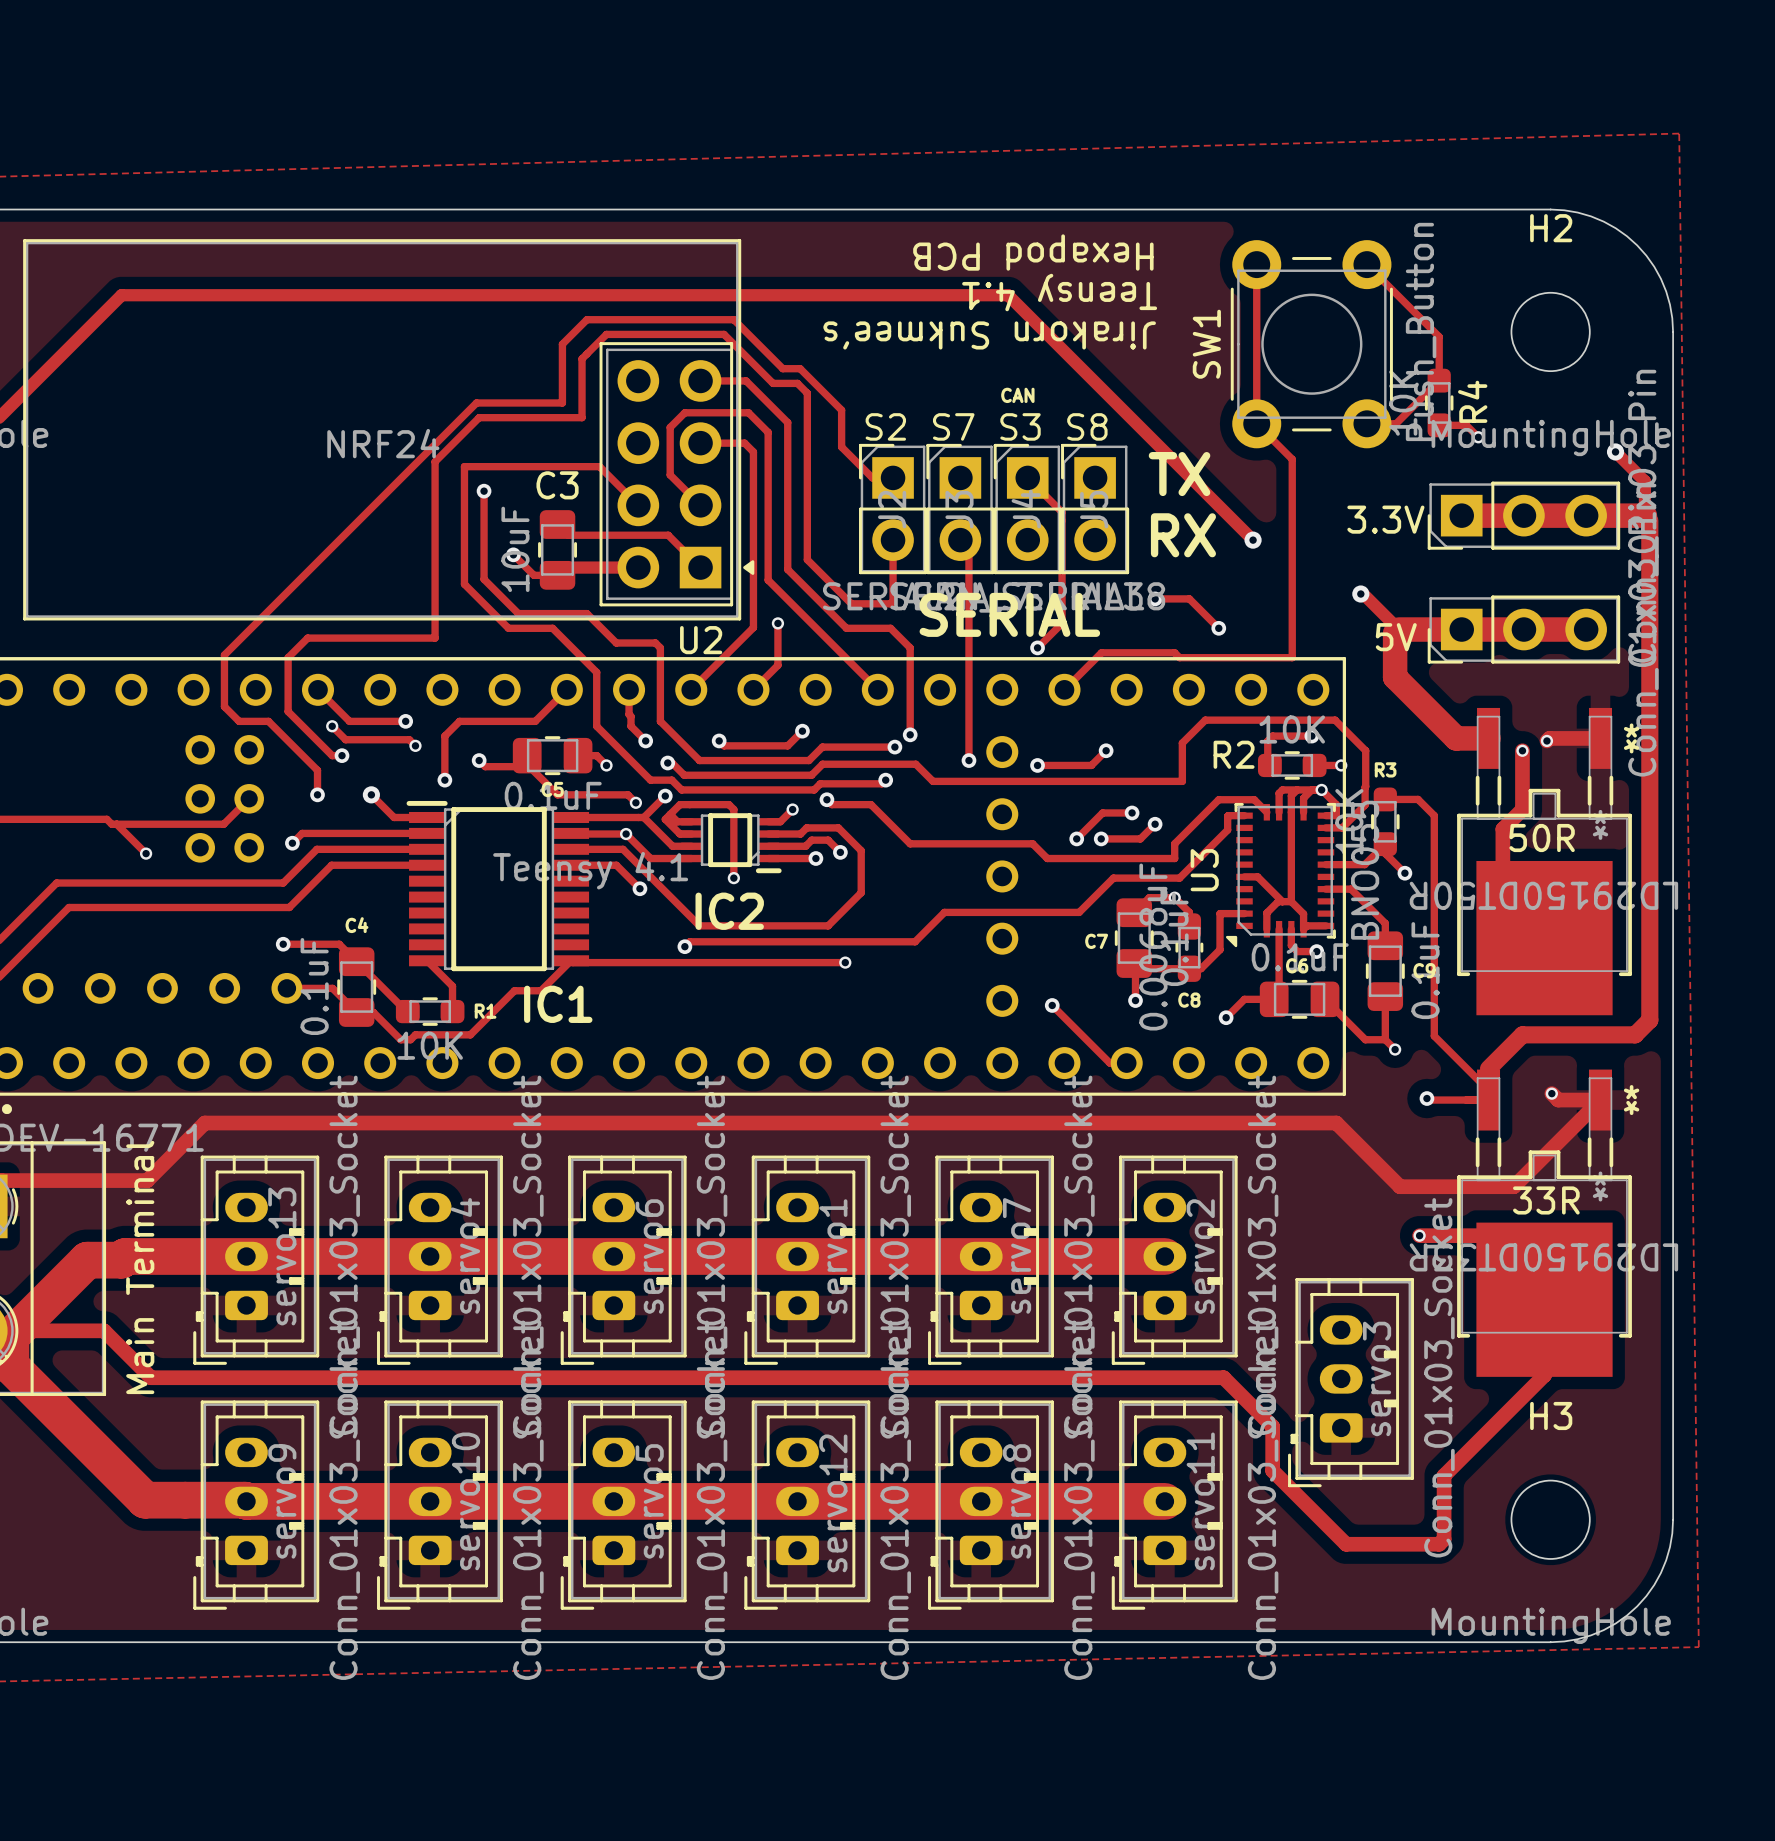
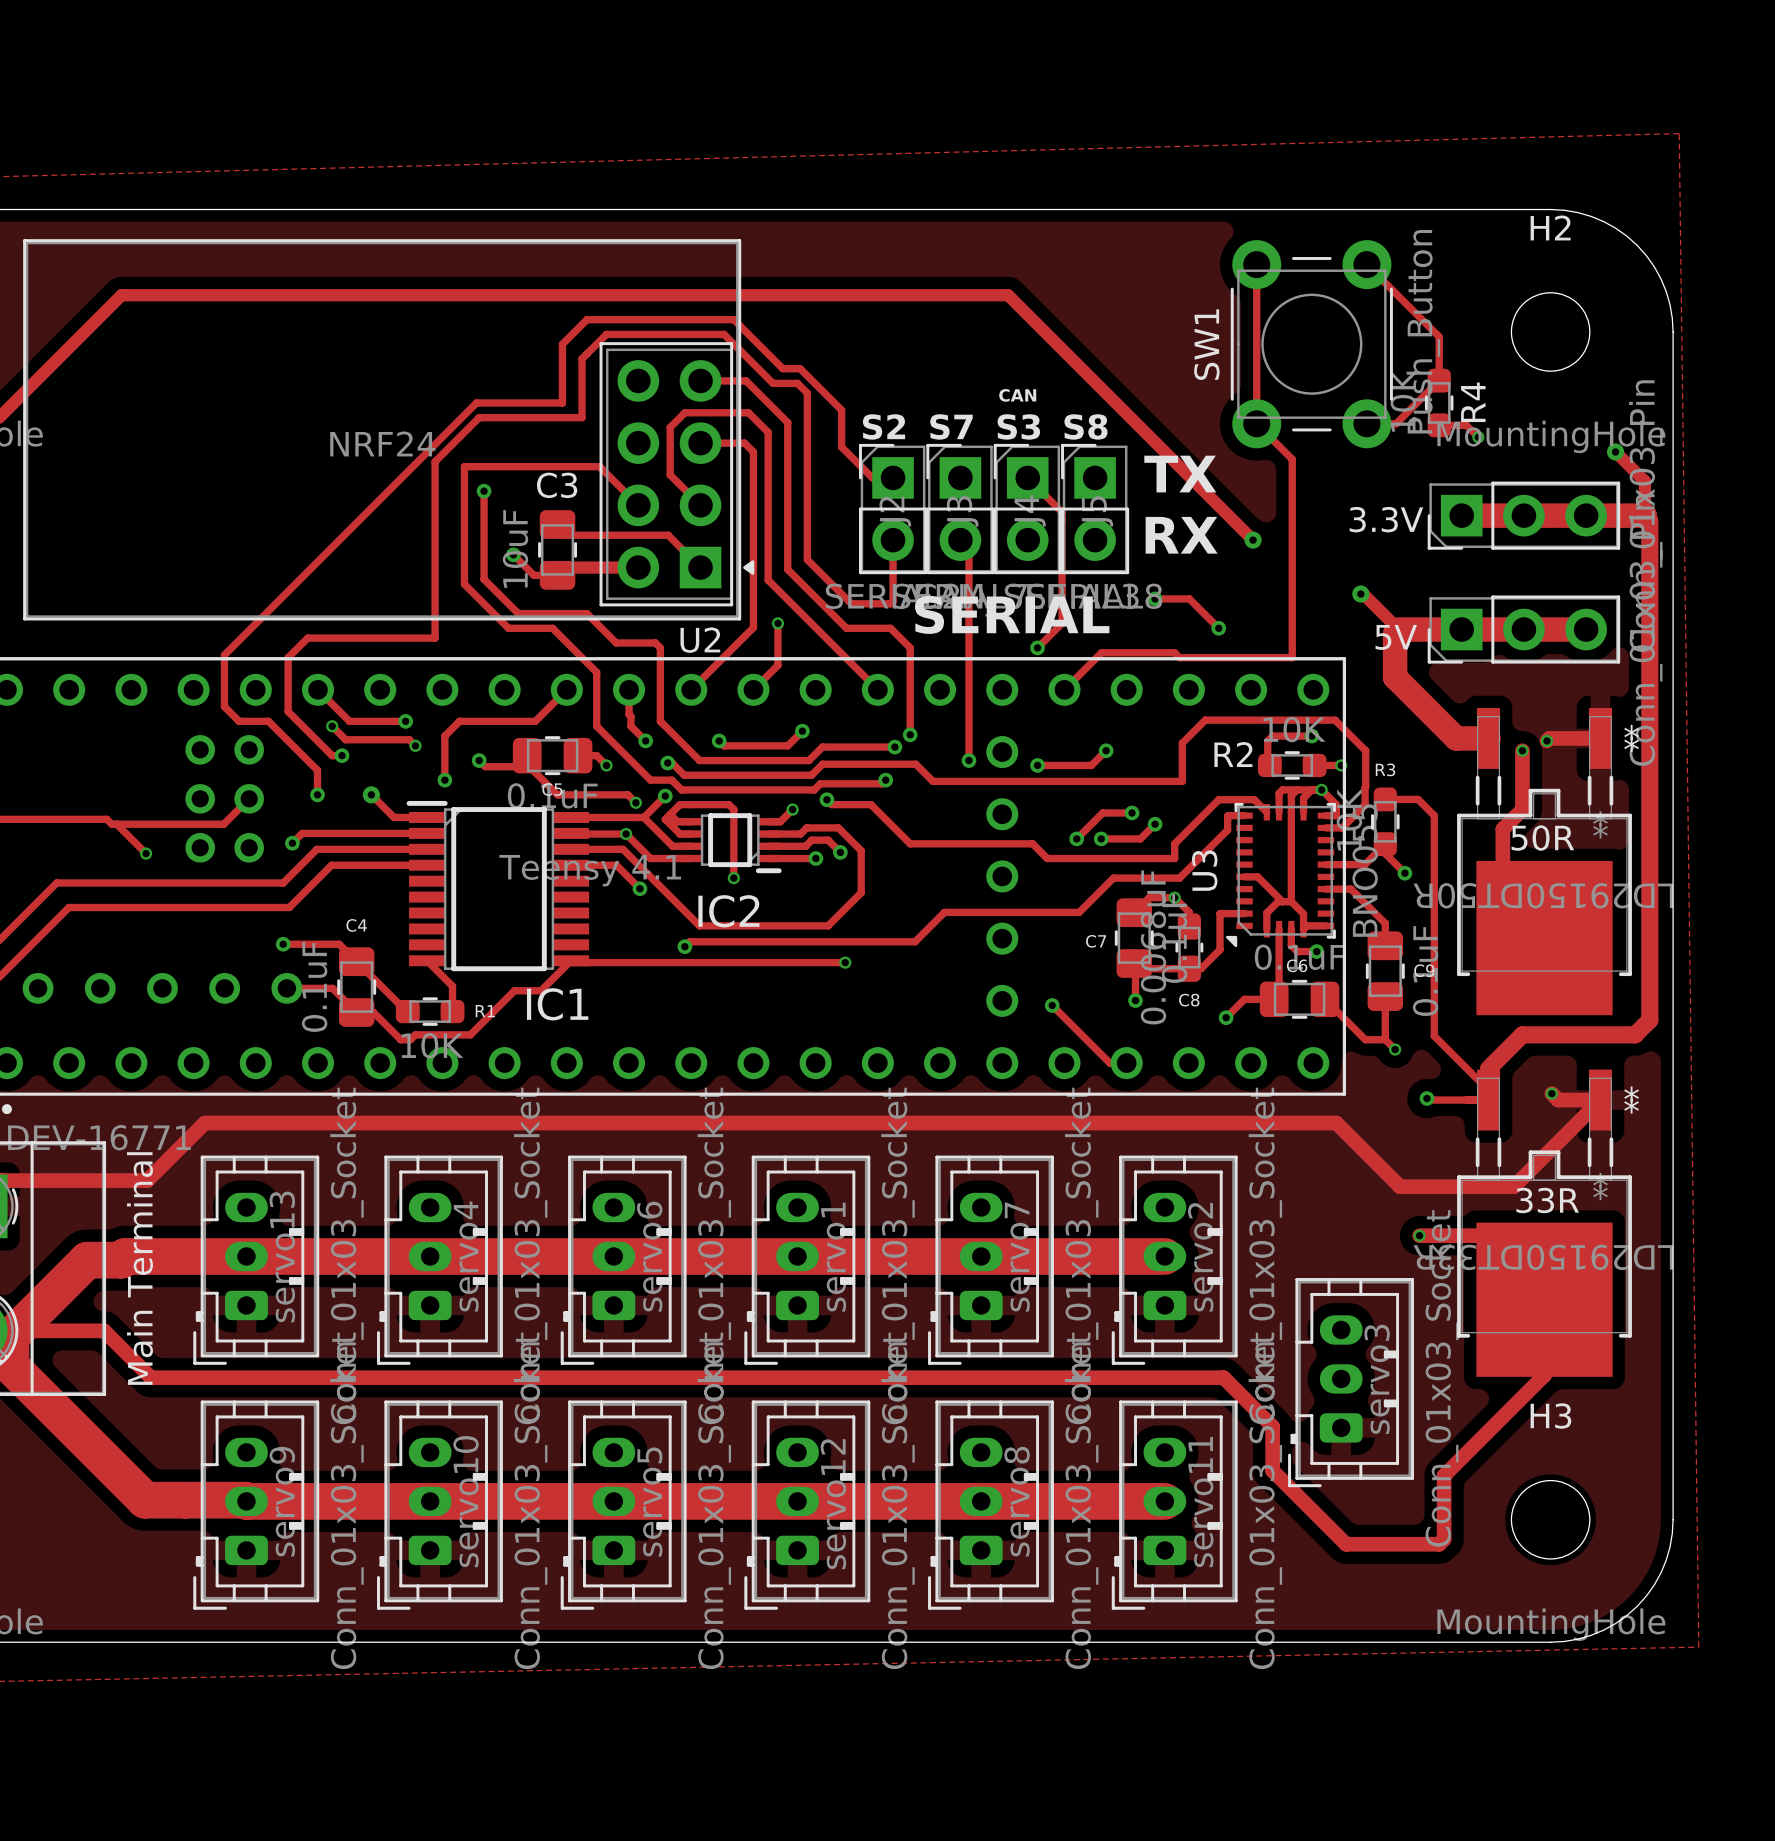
text: Hexapod PCB (1033, 252) -> none
text: Teensy 4.1 (1059, 292) -> none
text: Jirakorn Sukmee's (989, 335) -> none

